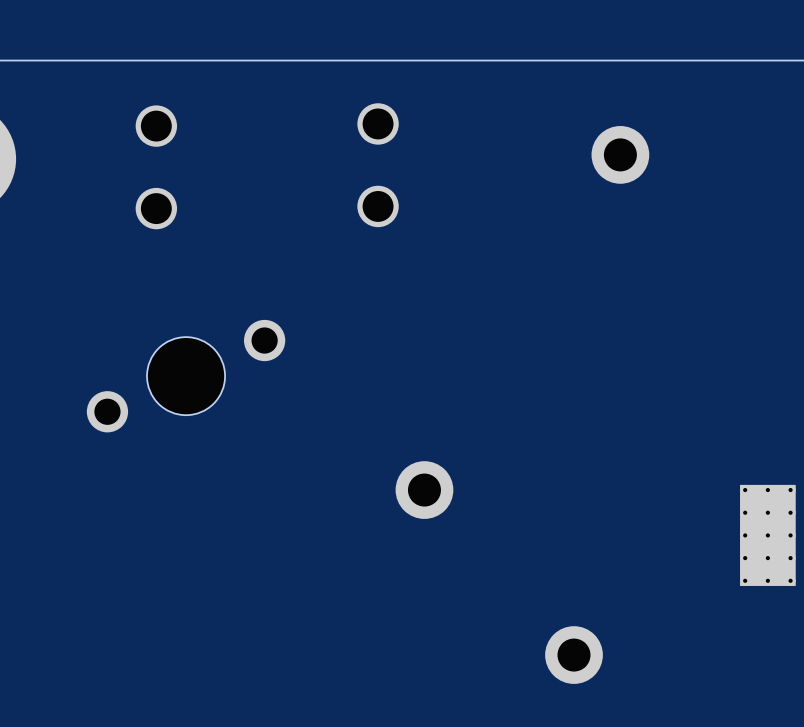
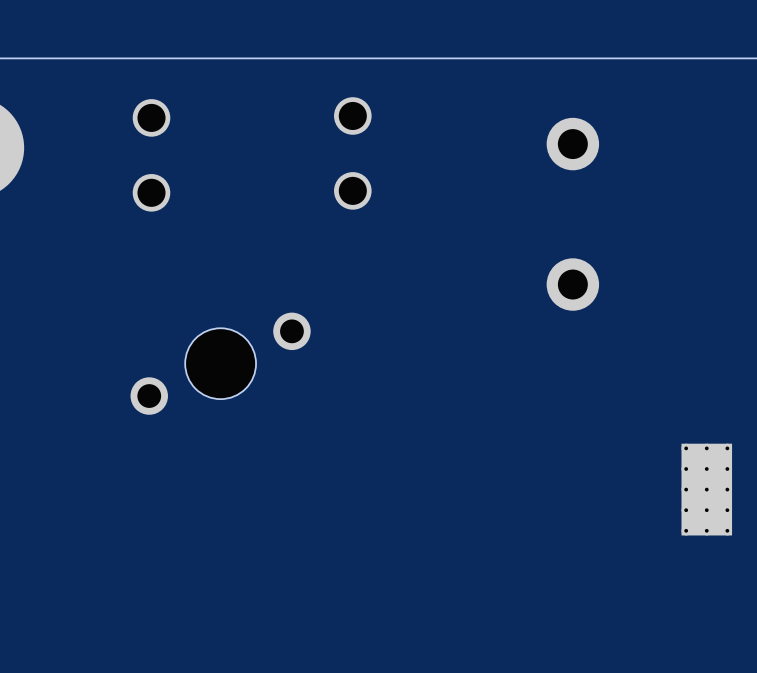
part: none -> (572, 284)
part position: (186, 376) -> (220, 363)
part: (424, 490) -> none
part: (574, 655) -> none

